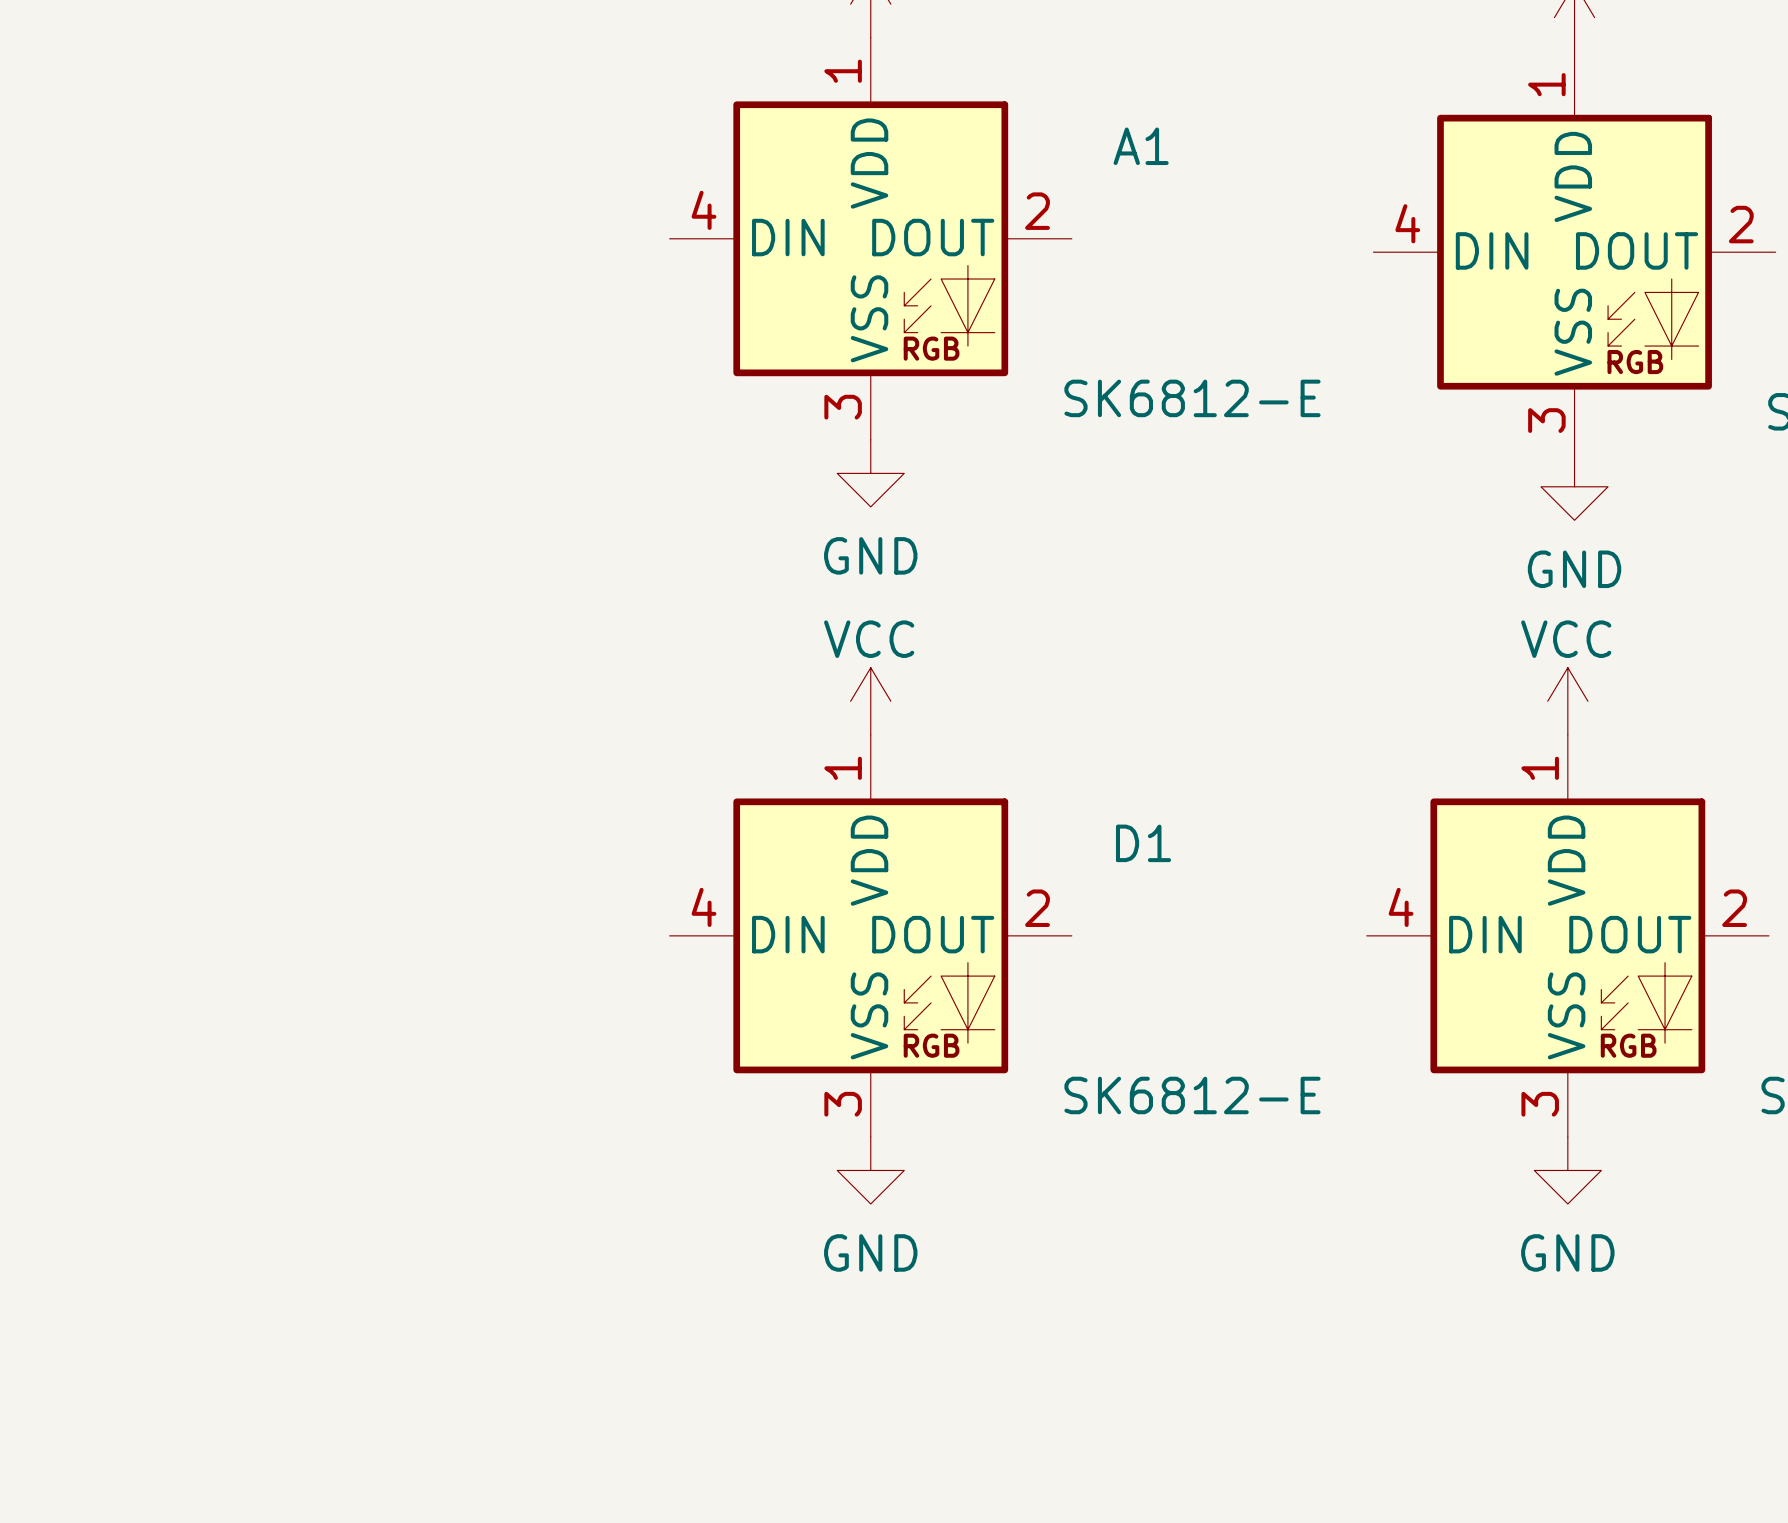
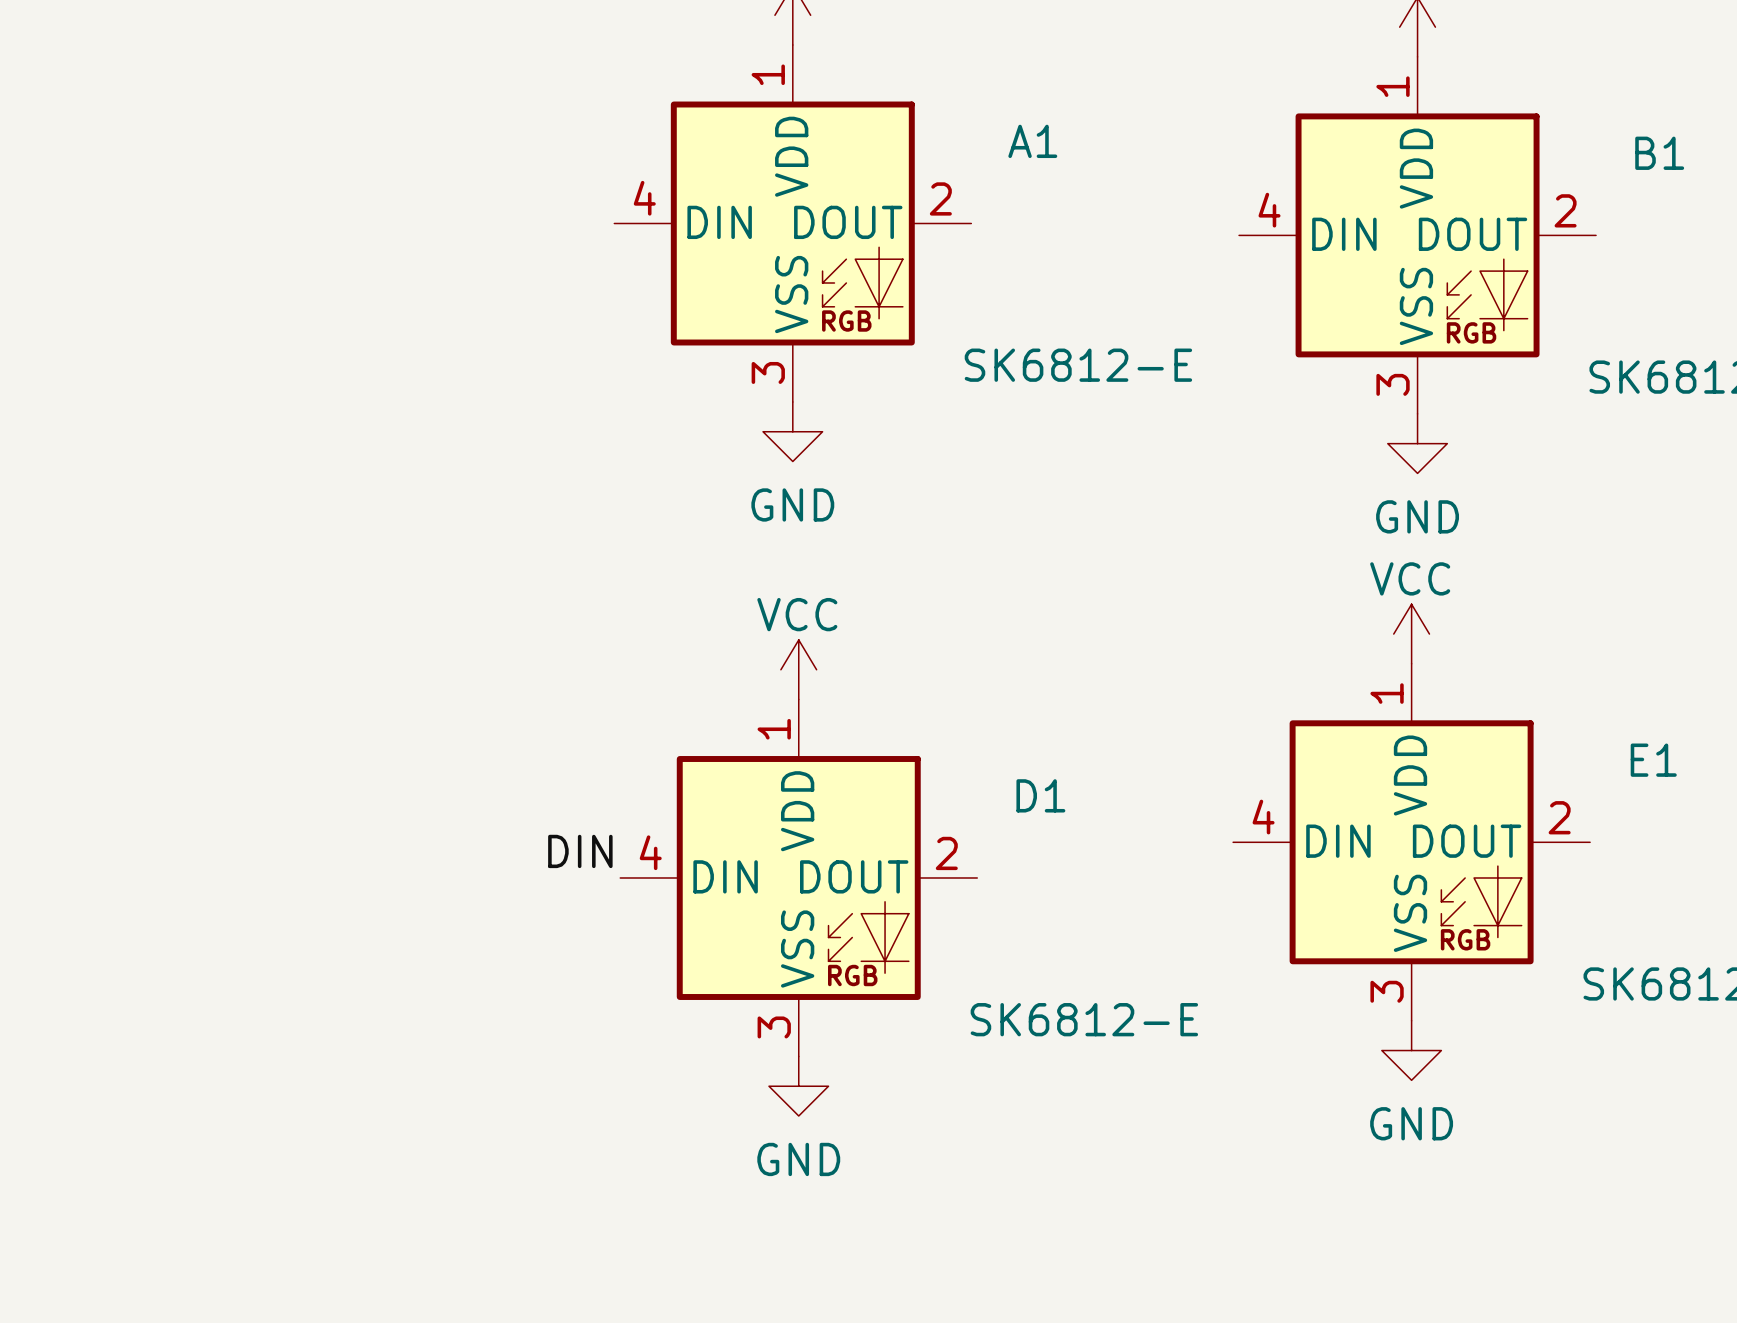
power symbol position: VCC (870, 701) -> VCC (798, 669)
D1 position: (870, 935) -> (798, 877)
label: none -> DIN (580, 851)
power symbol position: GND (870, 1170) -> GND (798, 1086)

